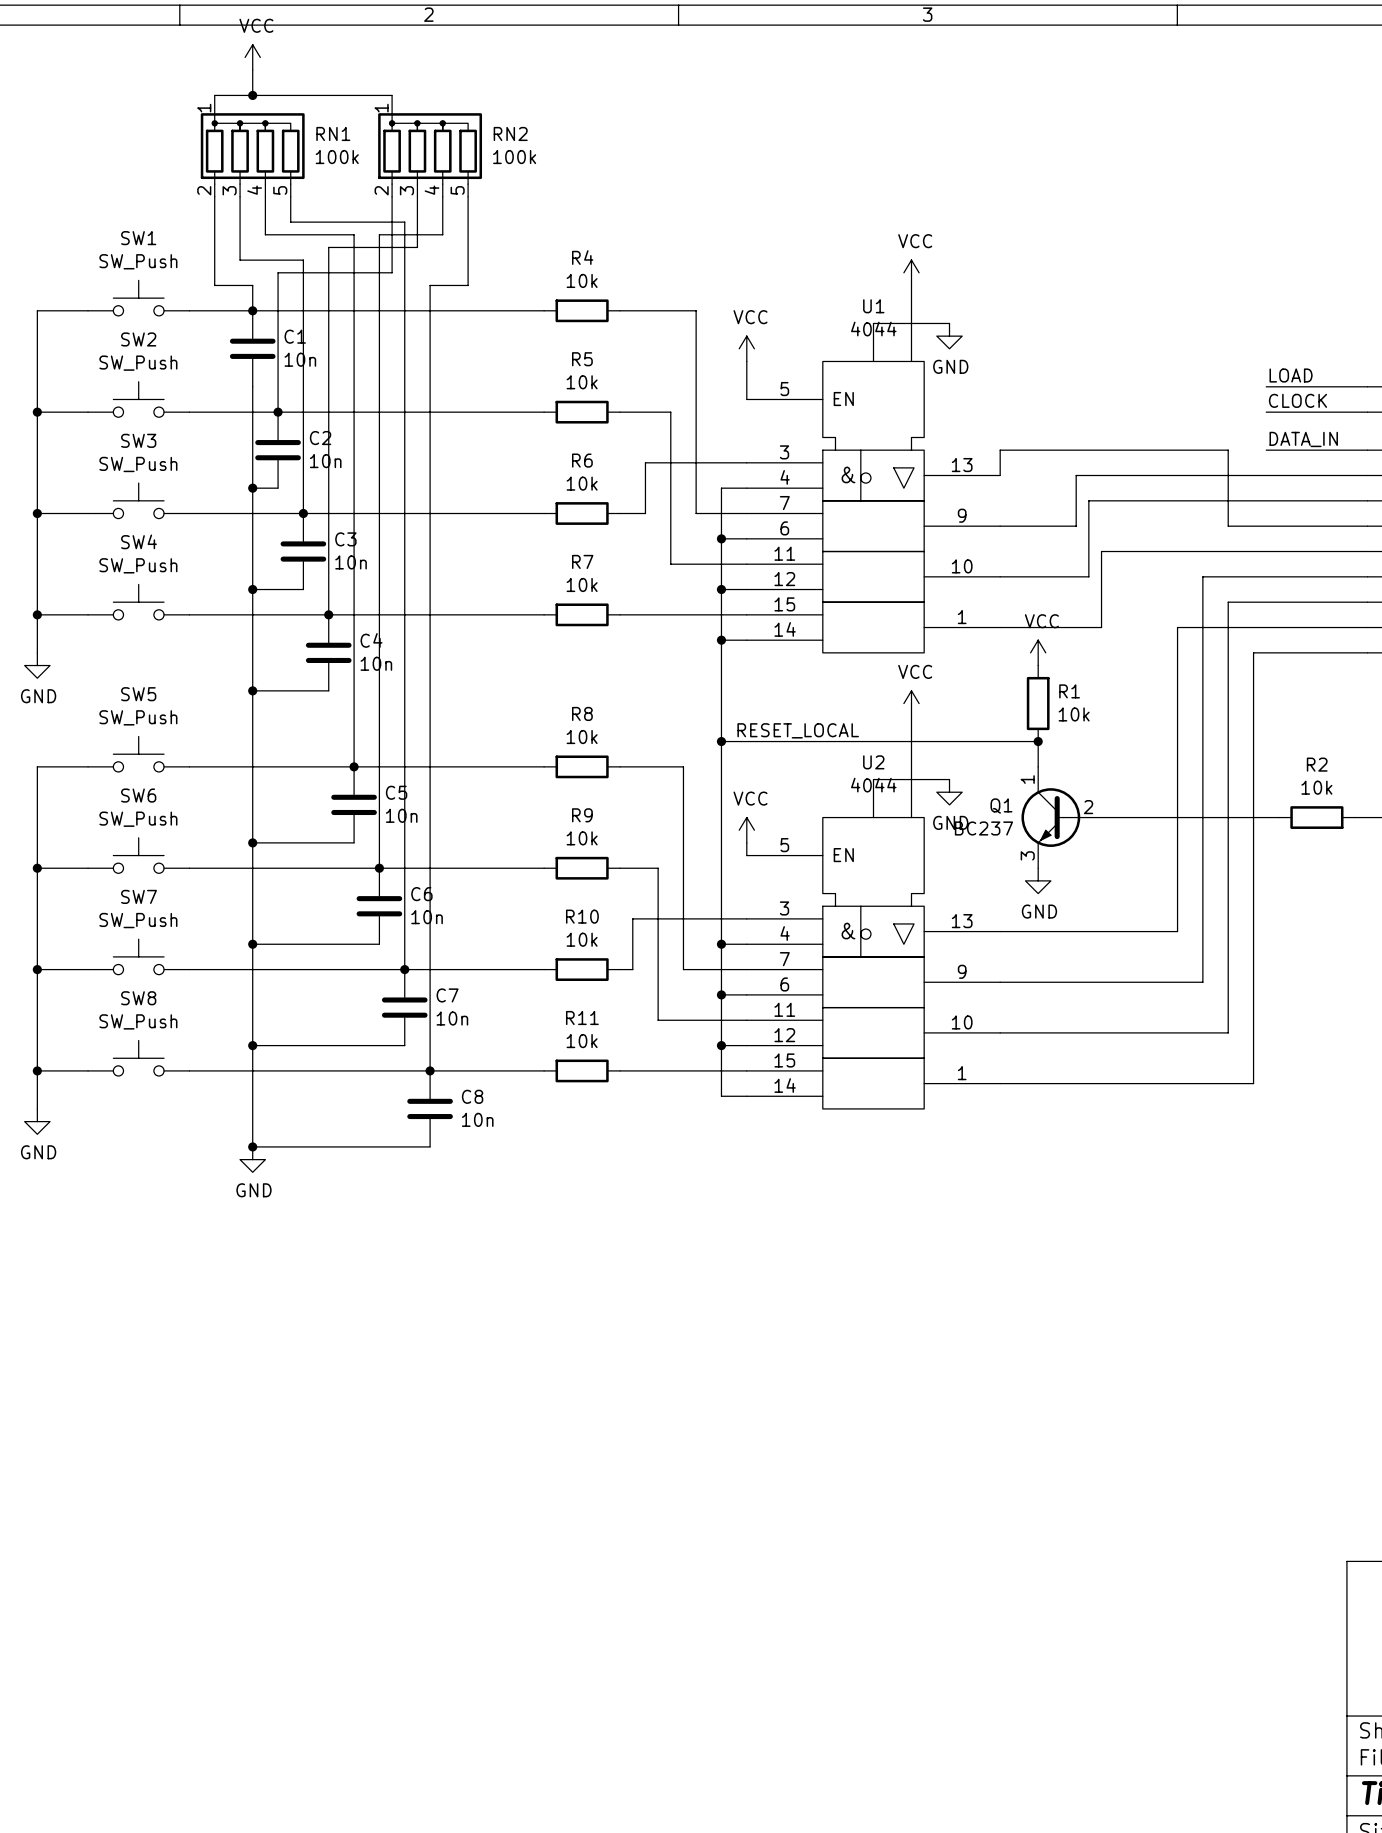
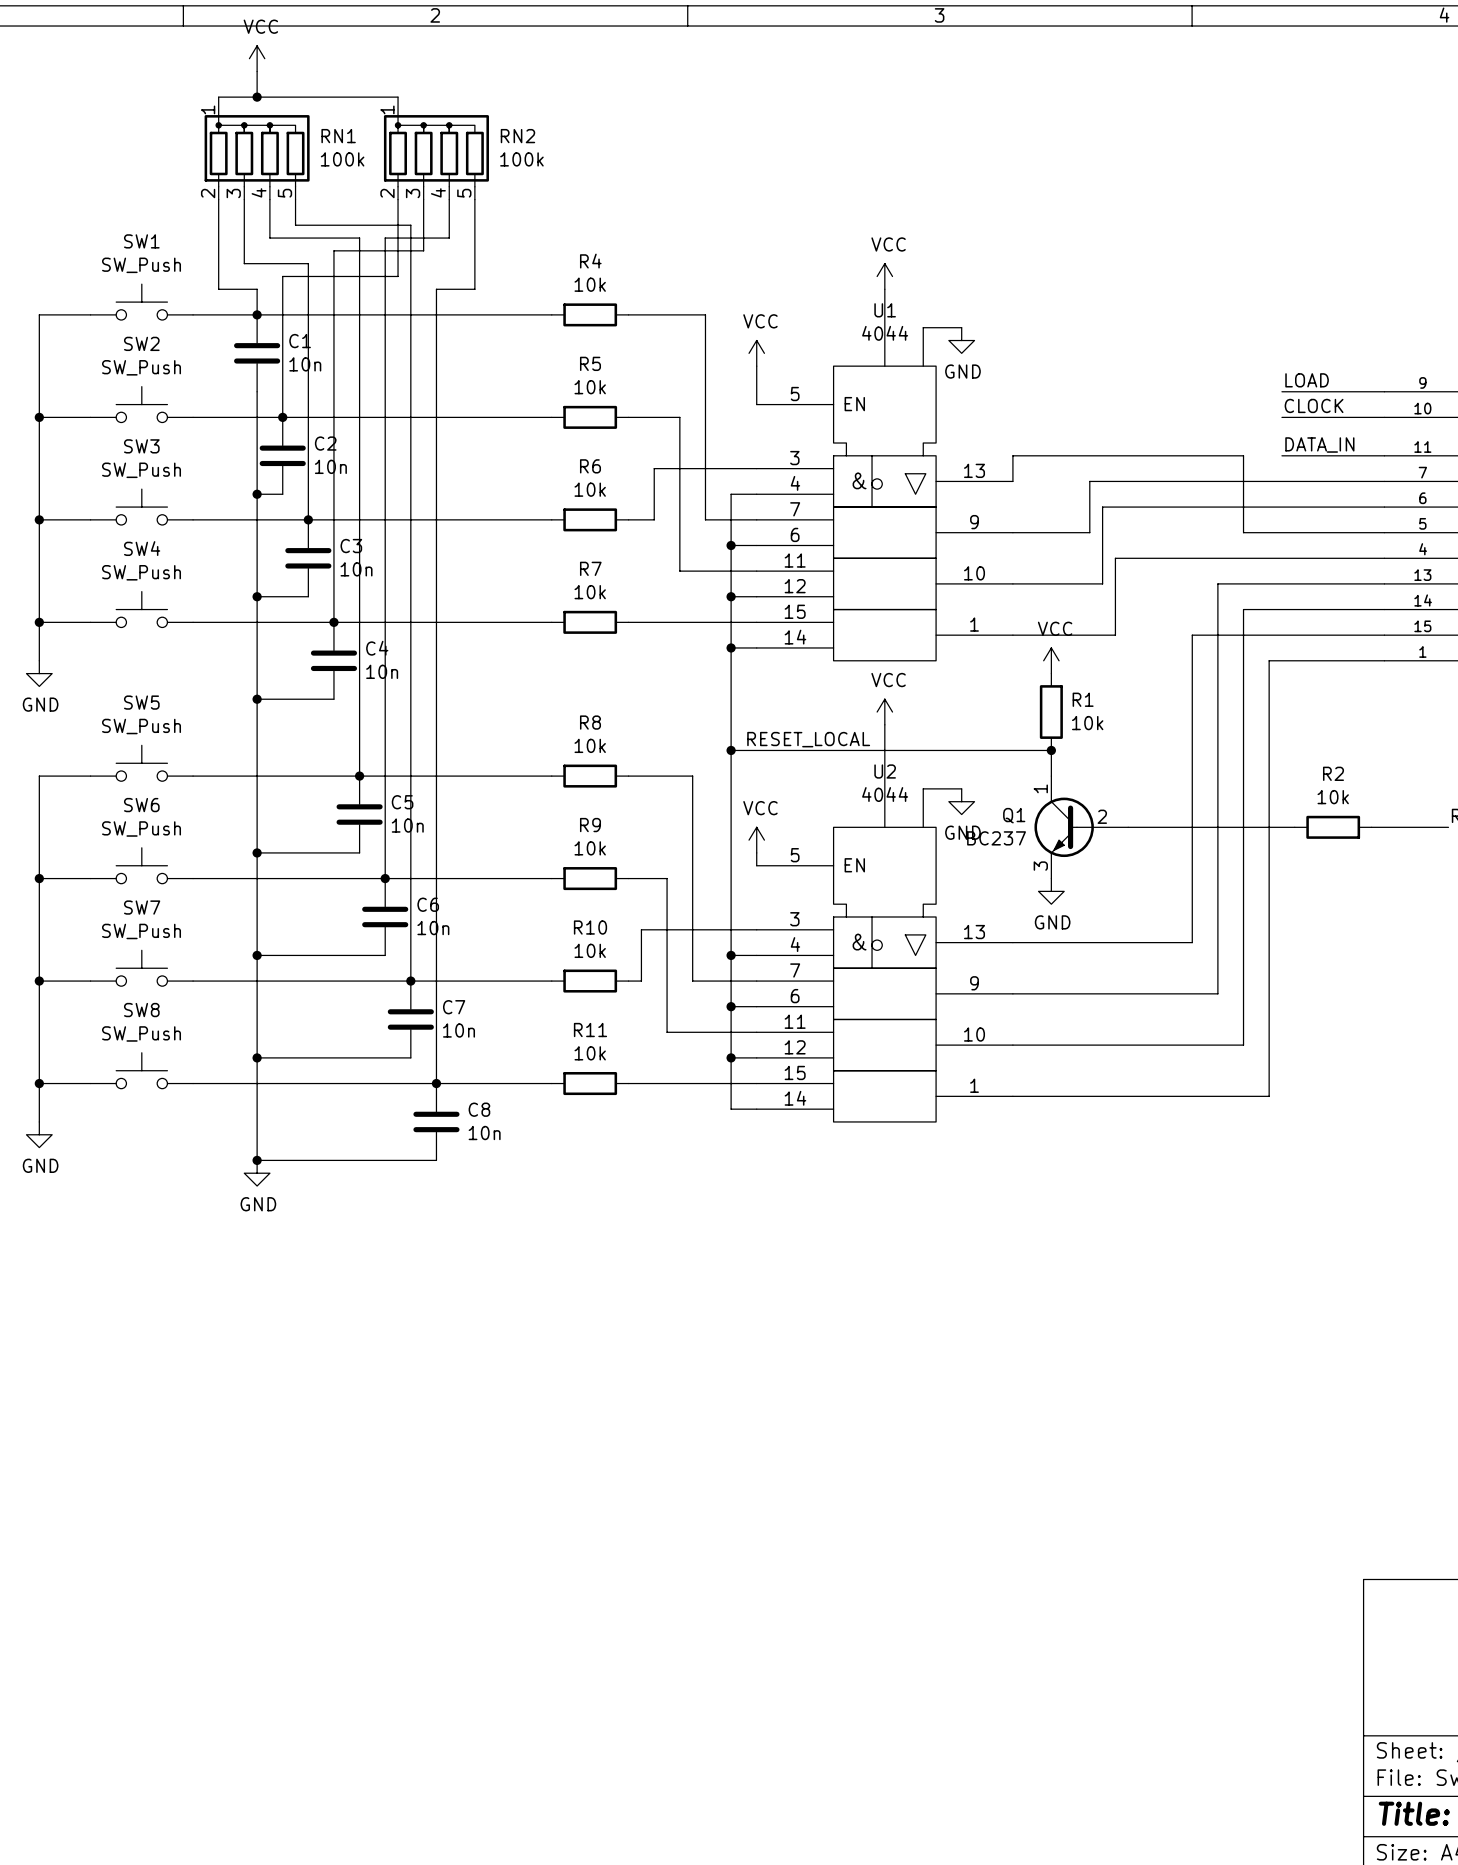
power symbol position: VCC (911, 272) -> VCC (884, 276)
wire: (911, 285) (911, 323) (873, 323) -> (884, 289) (884, 327)
power symbol position: VCC (911, 703) -> VCC (884, 712)
wire: (911, 716) (911, 779) (873, 779) -> (884, 724) (884, 788)

